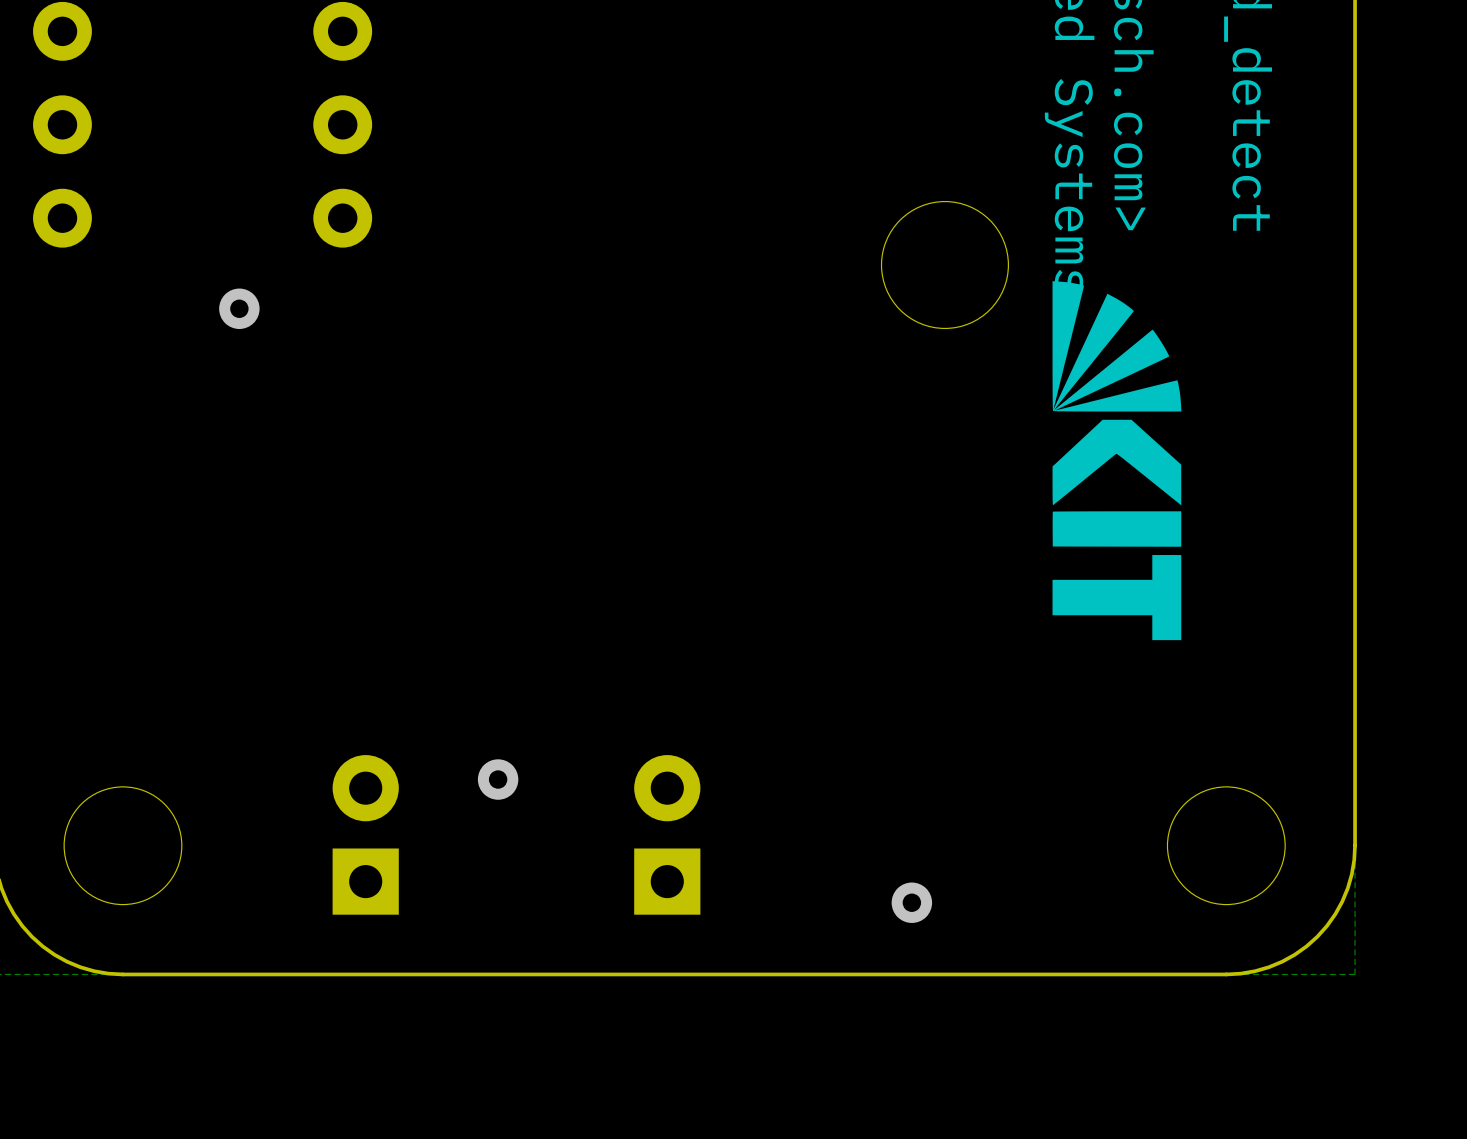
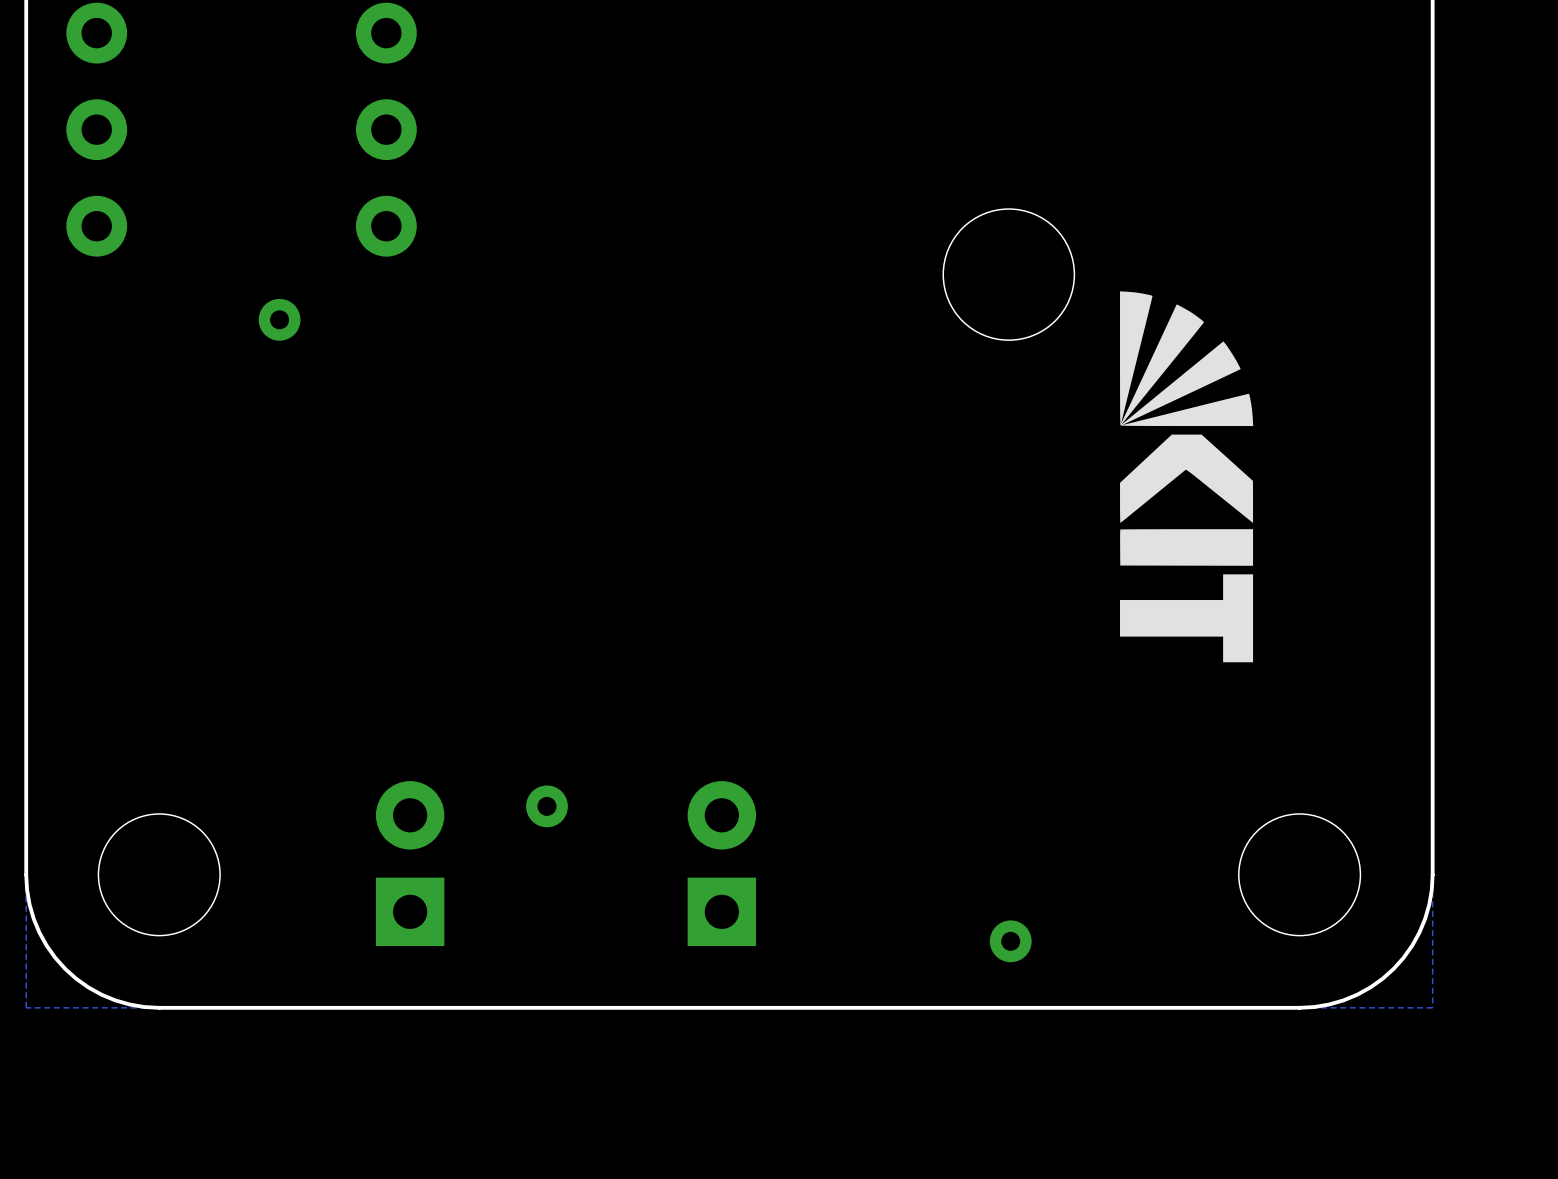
via position: (911, 902) -> (1010, 941)

